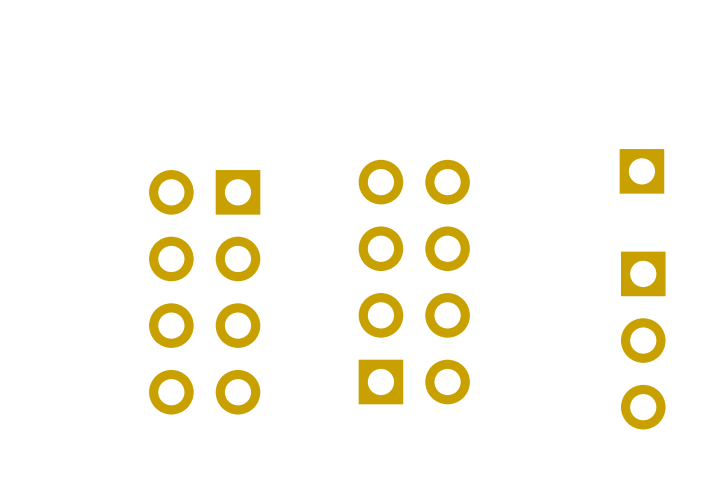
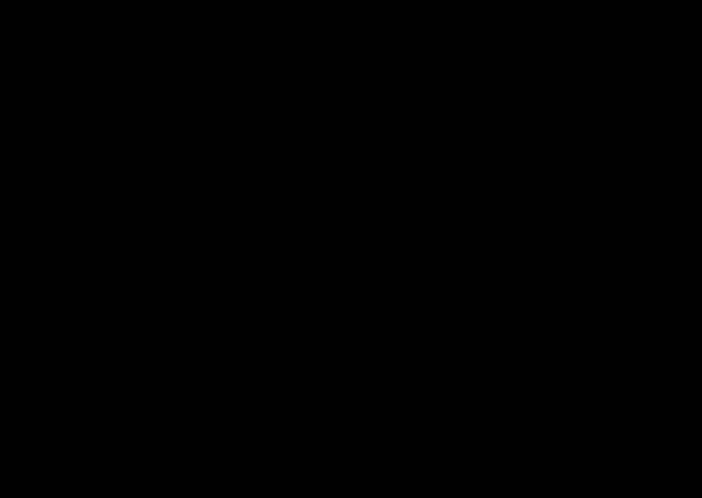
part: (641, 171) -> none
part: (414, 282) -> none
part: (204, 292) -> none
part: (643, 340) -> none

